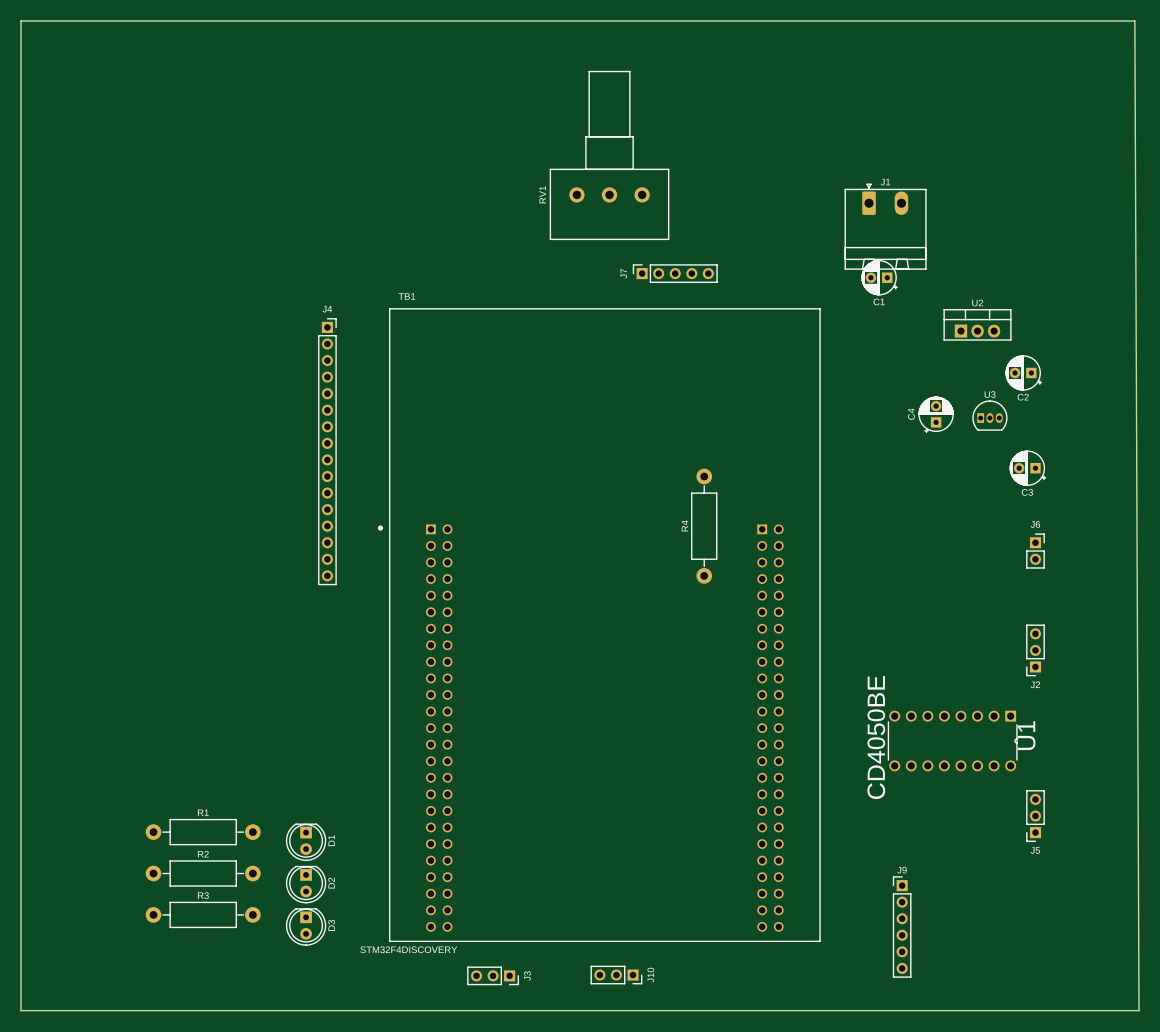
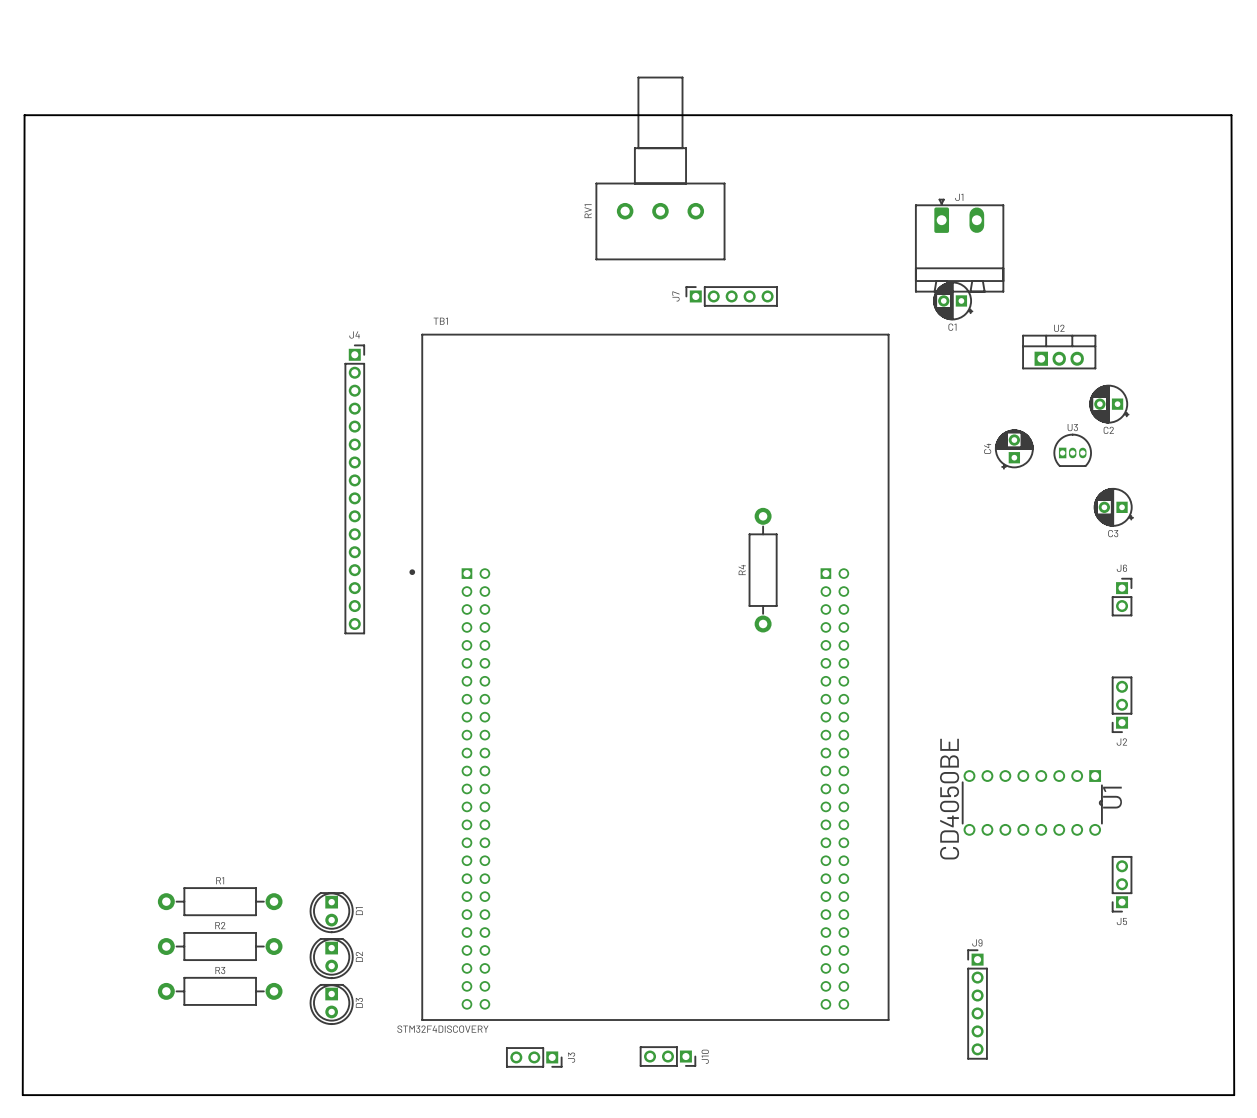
board edge: (21, 1010) (21, 21) (1134, 21) (1139, 1010) -> (22, 1095) (24, 115) (1231, 115) (1234, 1095)

